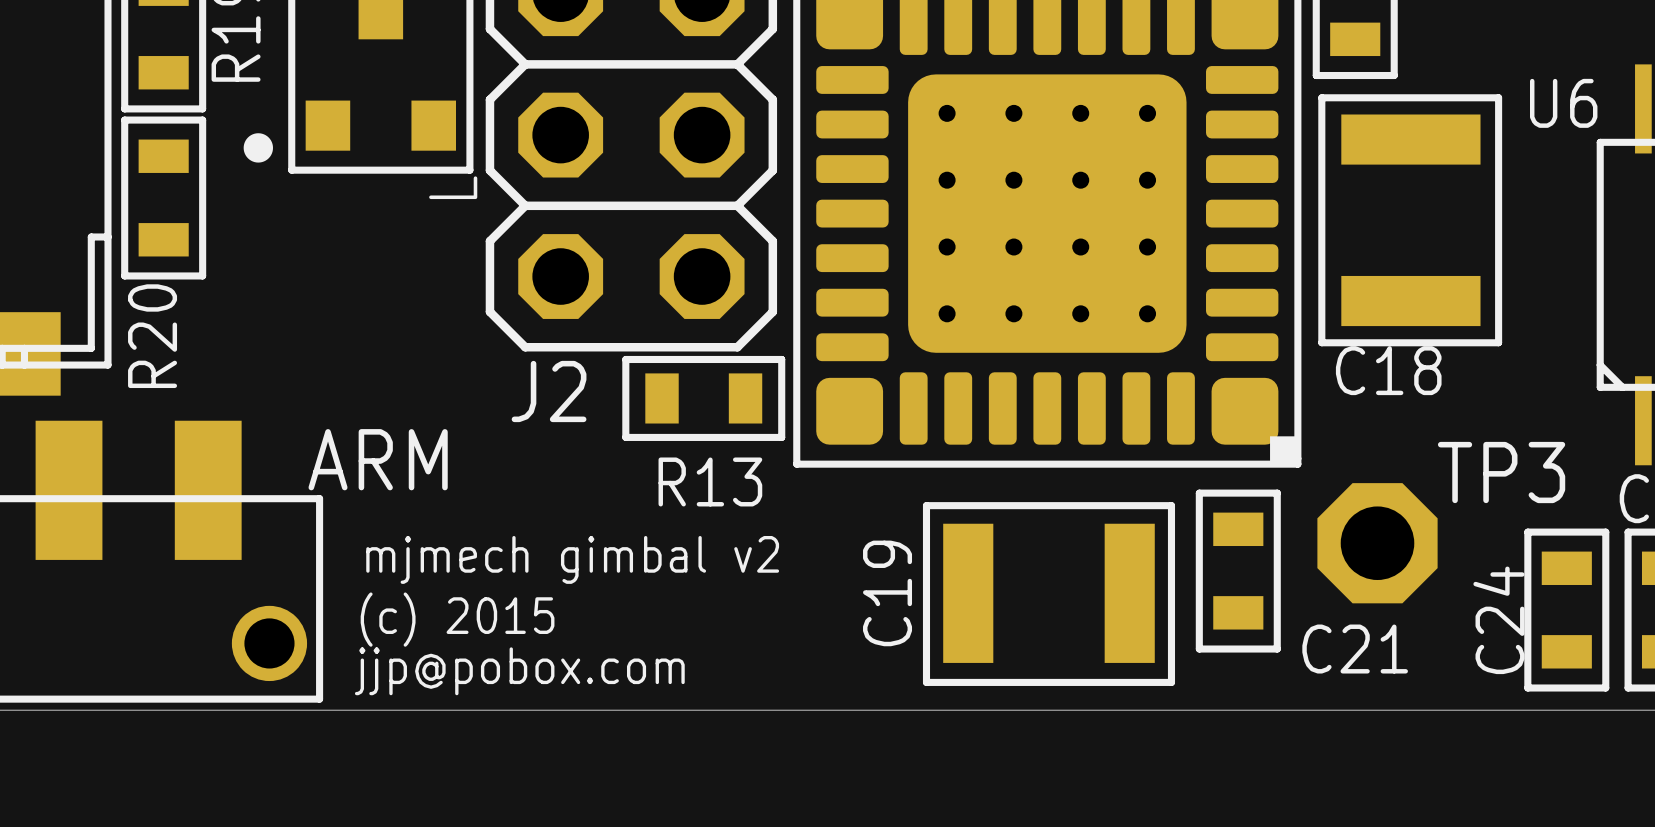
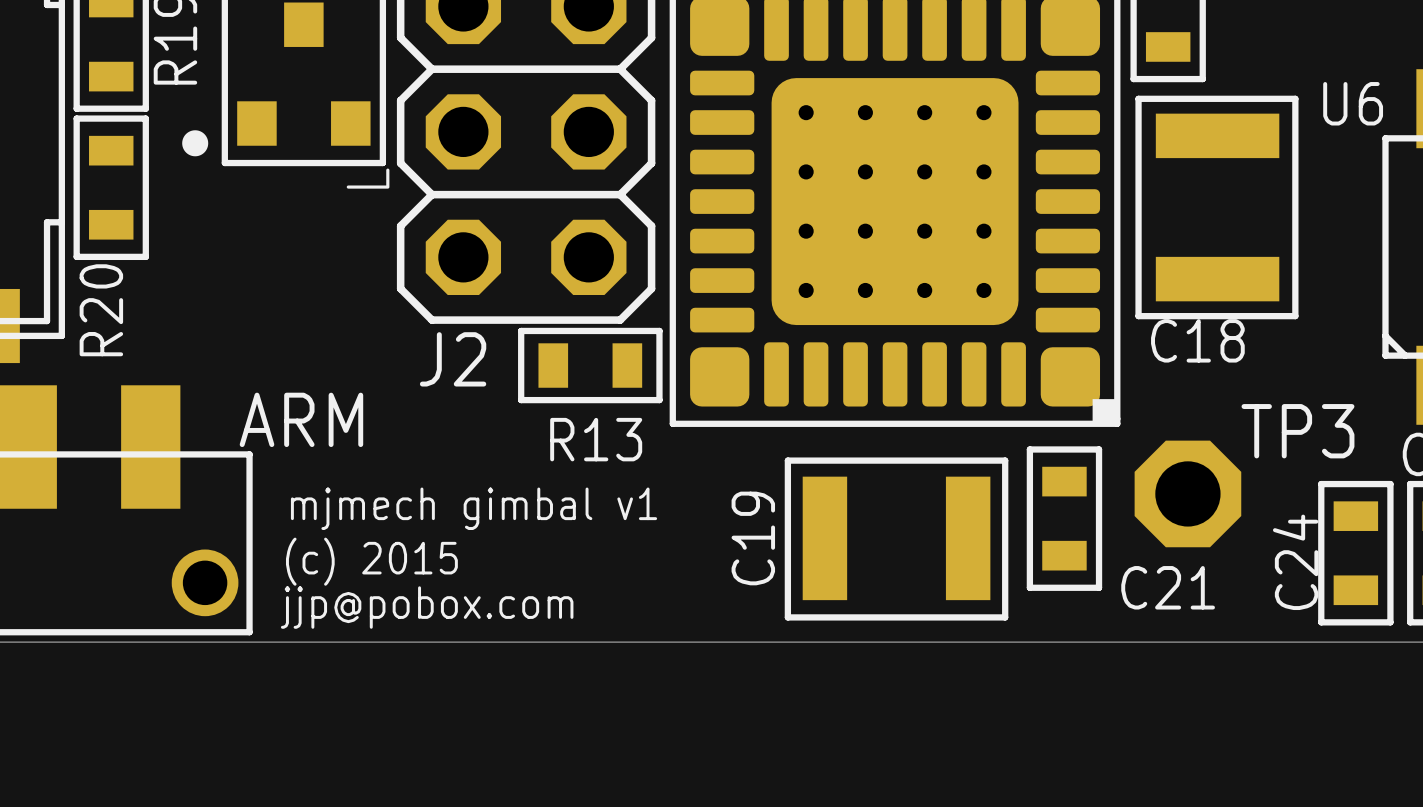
text: mjmech gimbal v2 (572, 559) -> mjmech gimbal v1 (474, 508)

